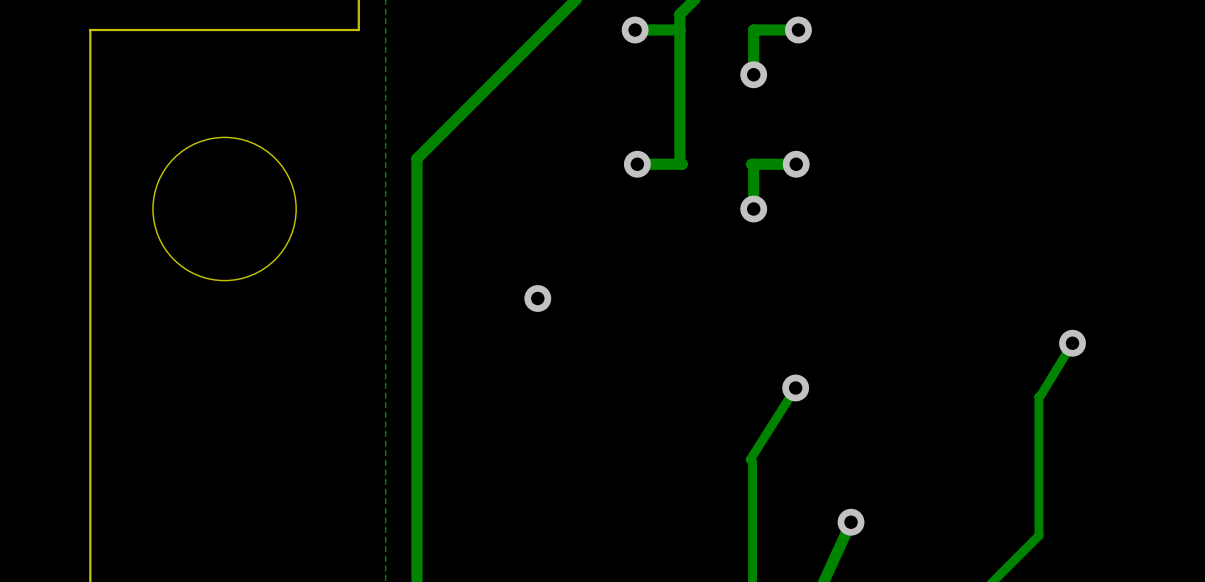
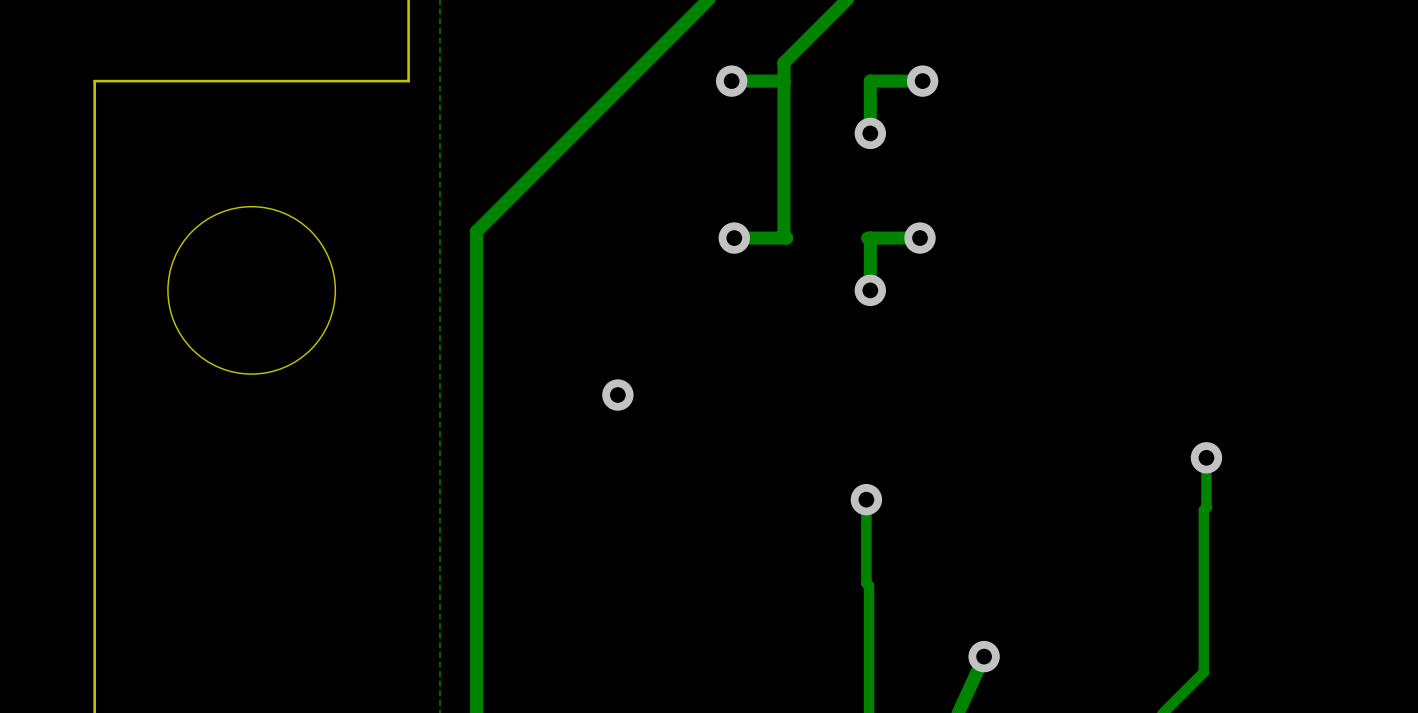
track: (1072, 343) (1041, 394) -> (1206, 457) (1206, 507)
via position: (1072, 343) -> (1206, 457)
track: (795, 387) (750, 459) -> (866, 499) (866, 583)
via position: (795, 387) -> (866, 499)

